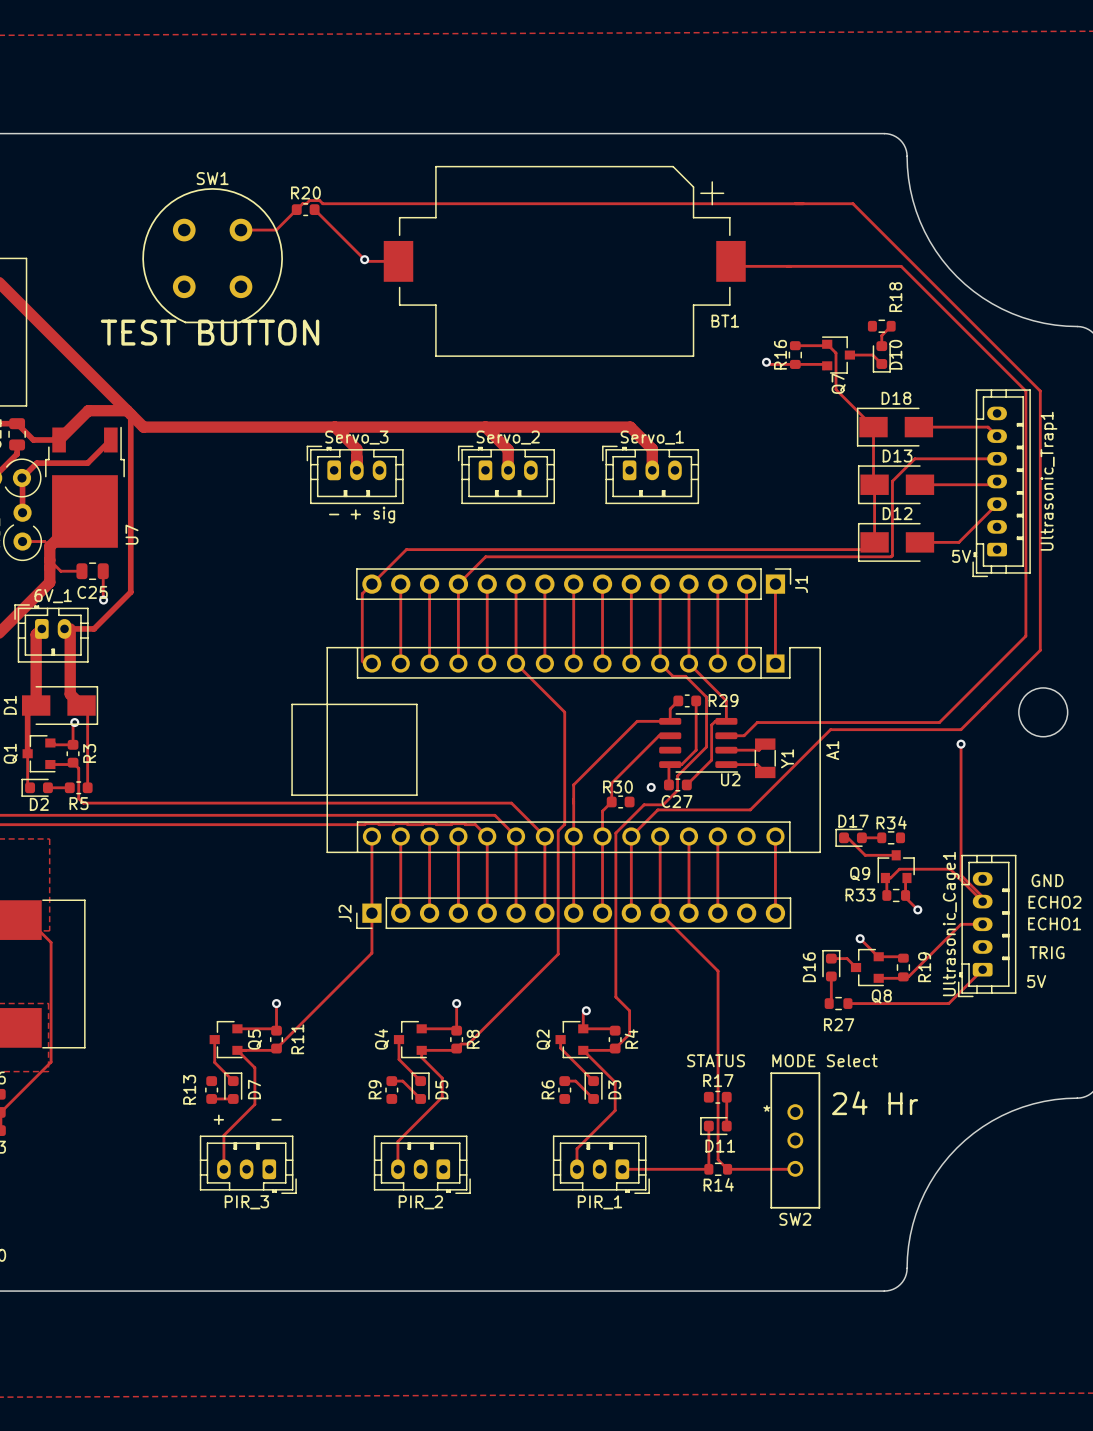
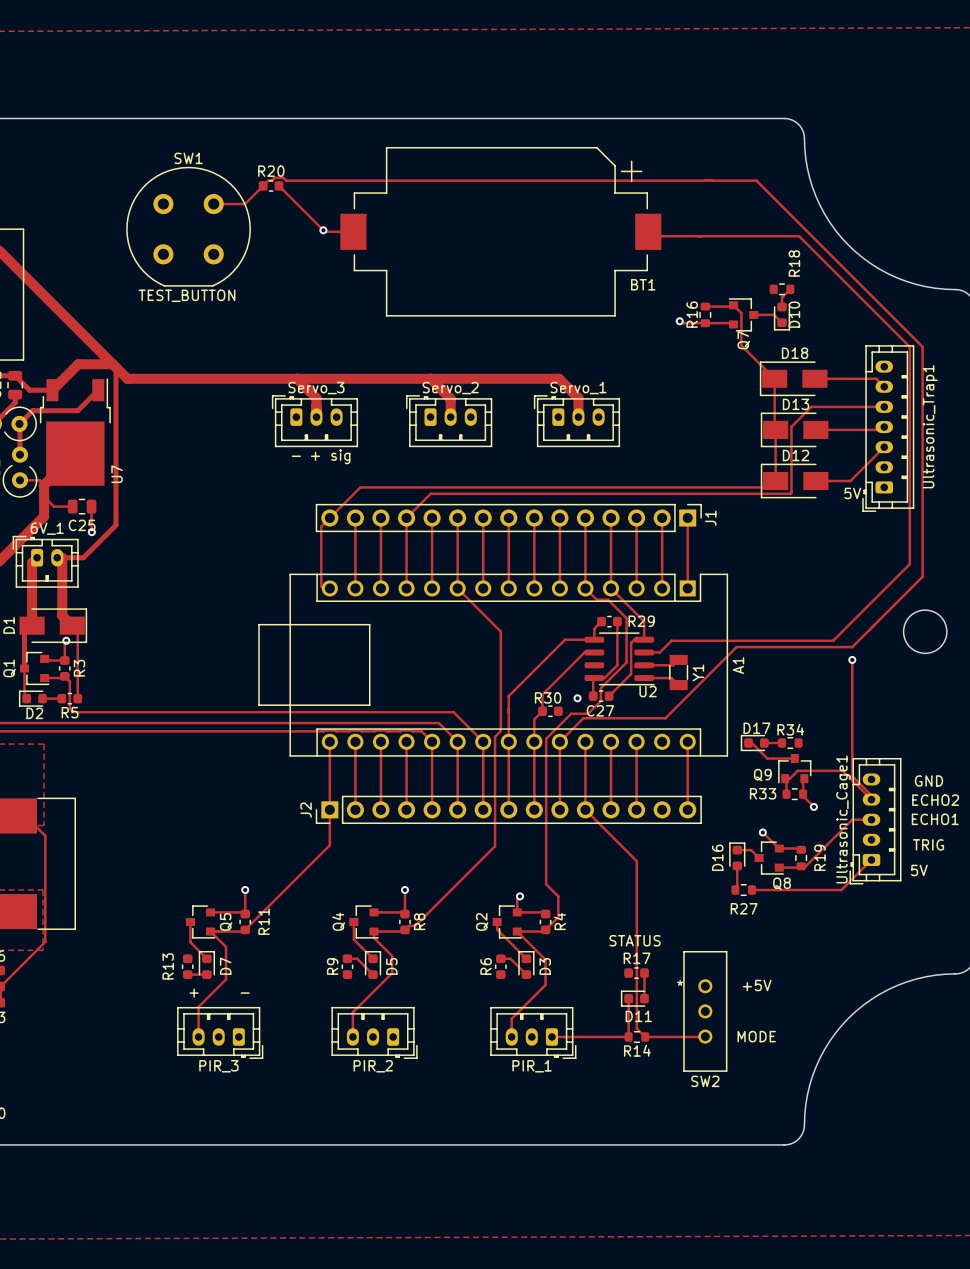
text: TEST BUTTON (210, 332) -> TEST_BUTTON (186, 295)
text: MODE Select (824, 1060) -> none
text: 24 Hr (875, 1103) -> none
text: none -> +5V (757, 985)
text: none -> MODE (756, 1036)

